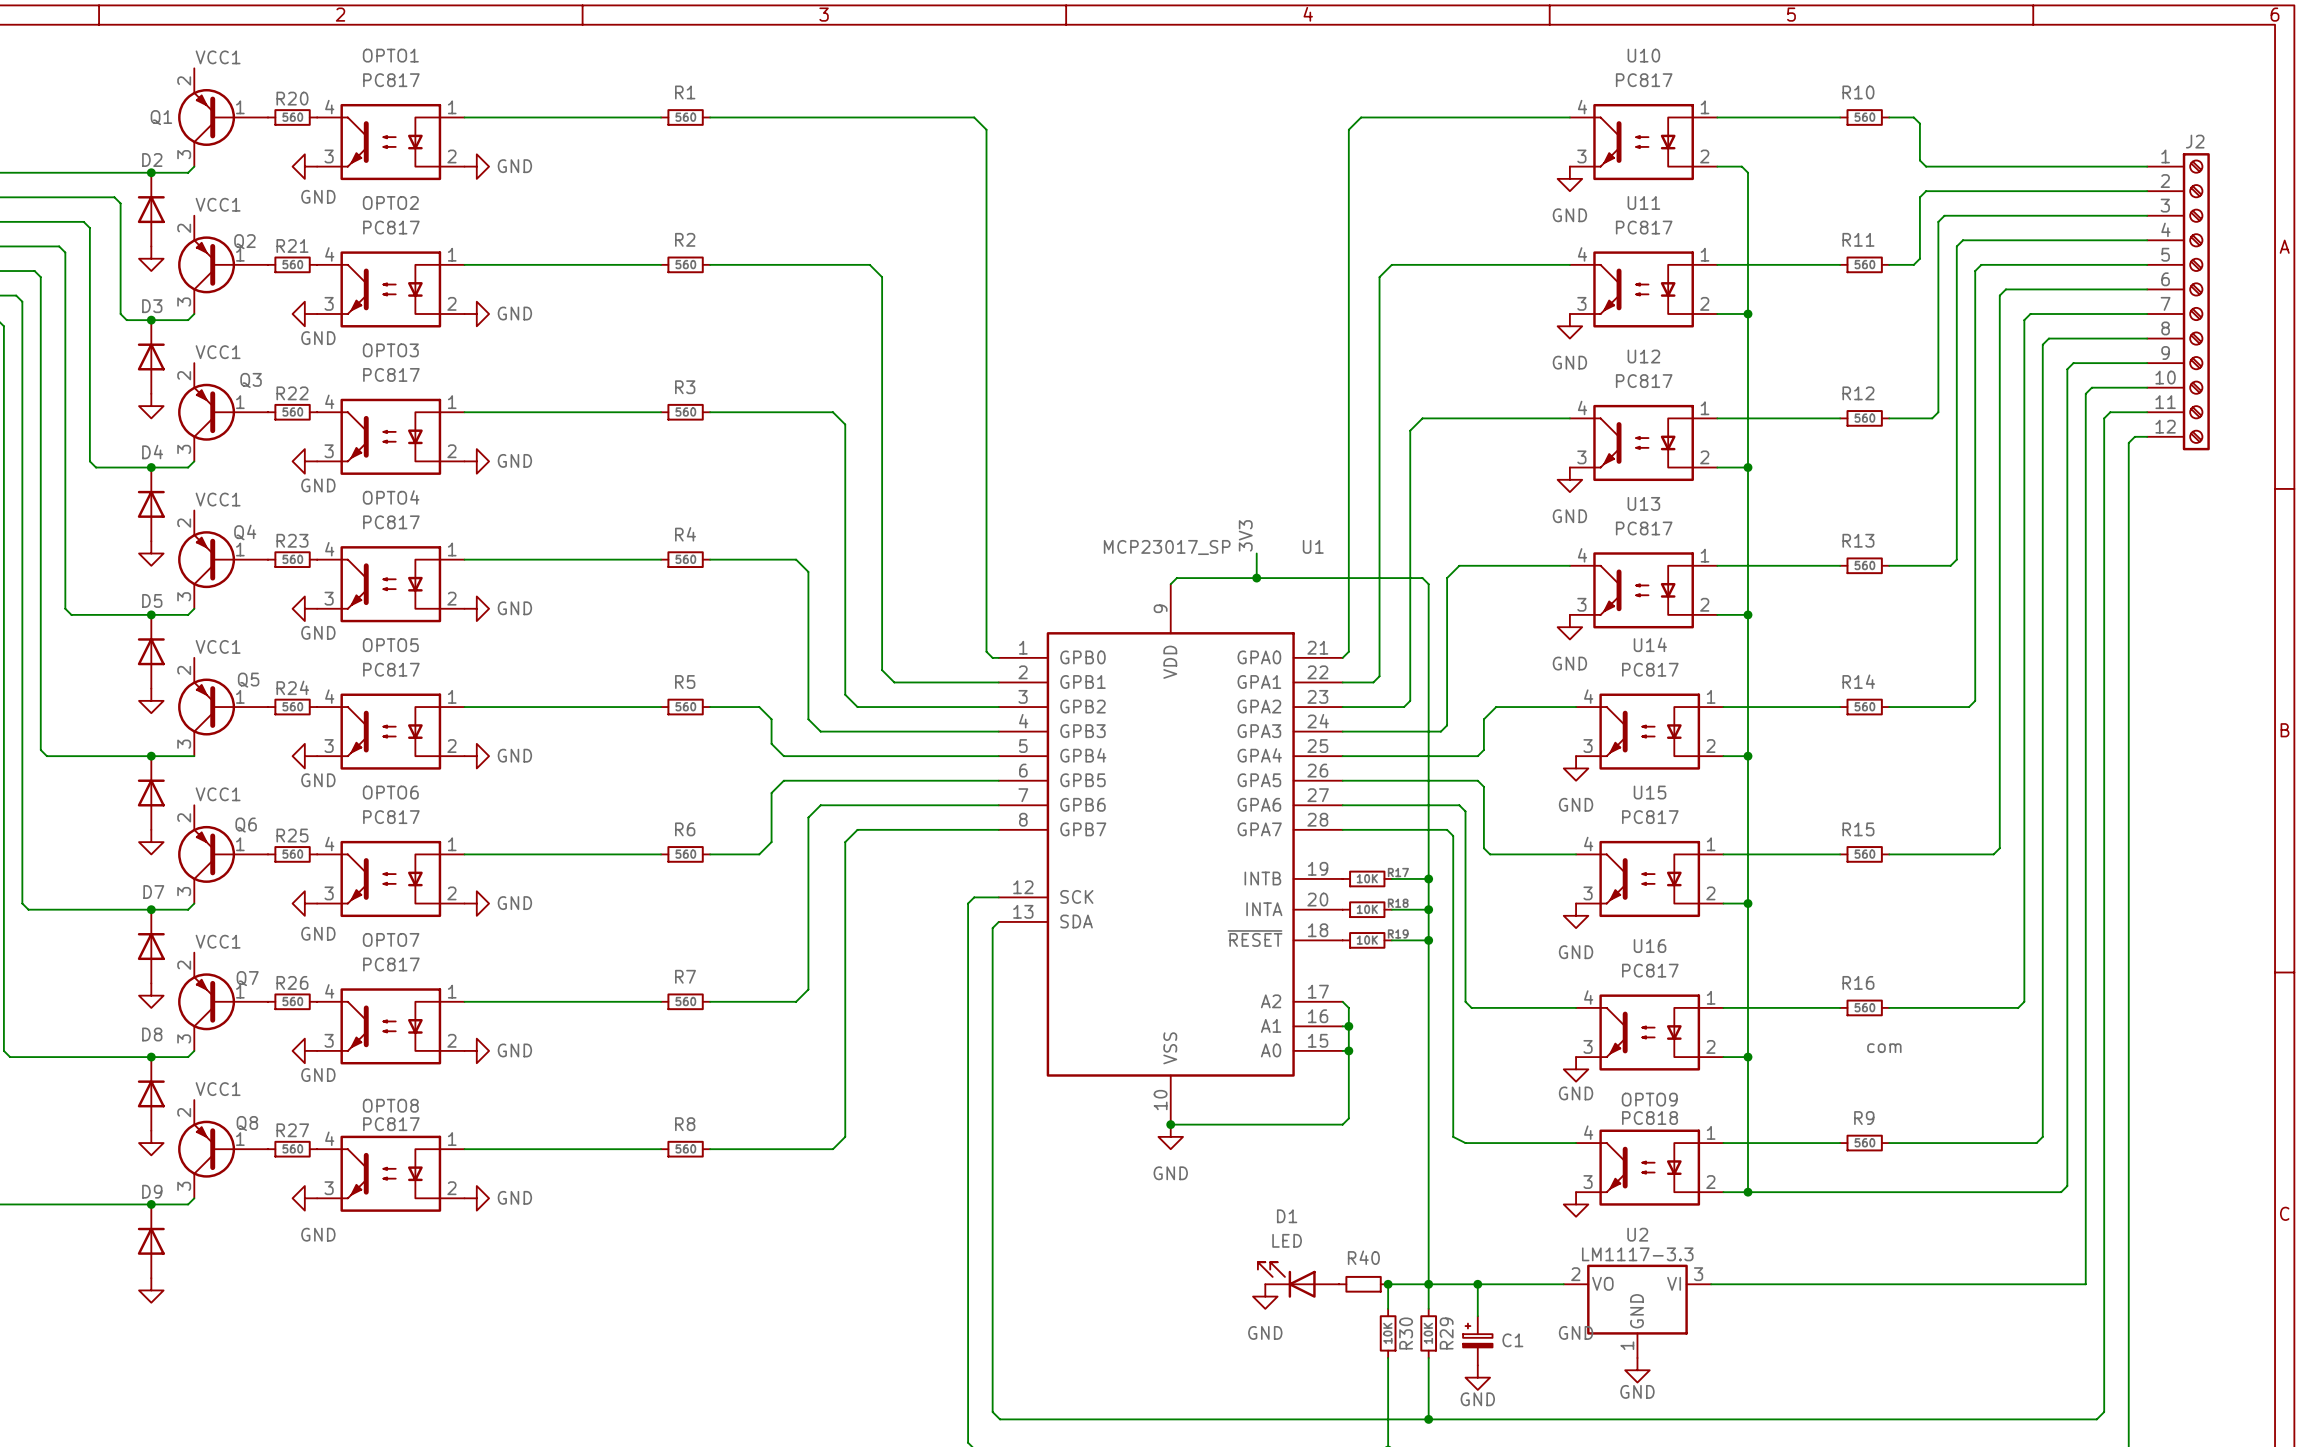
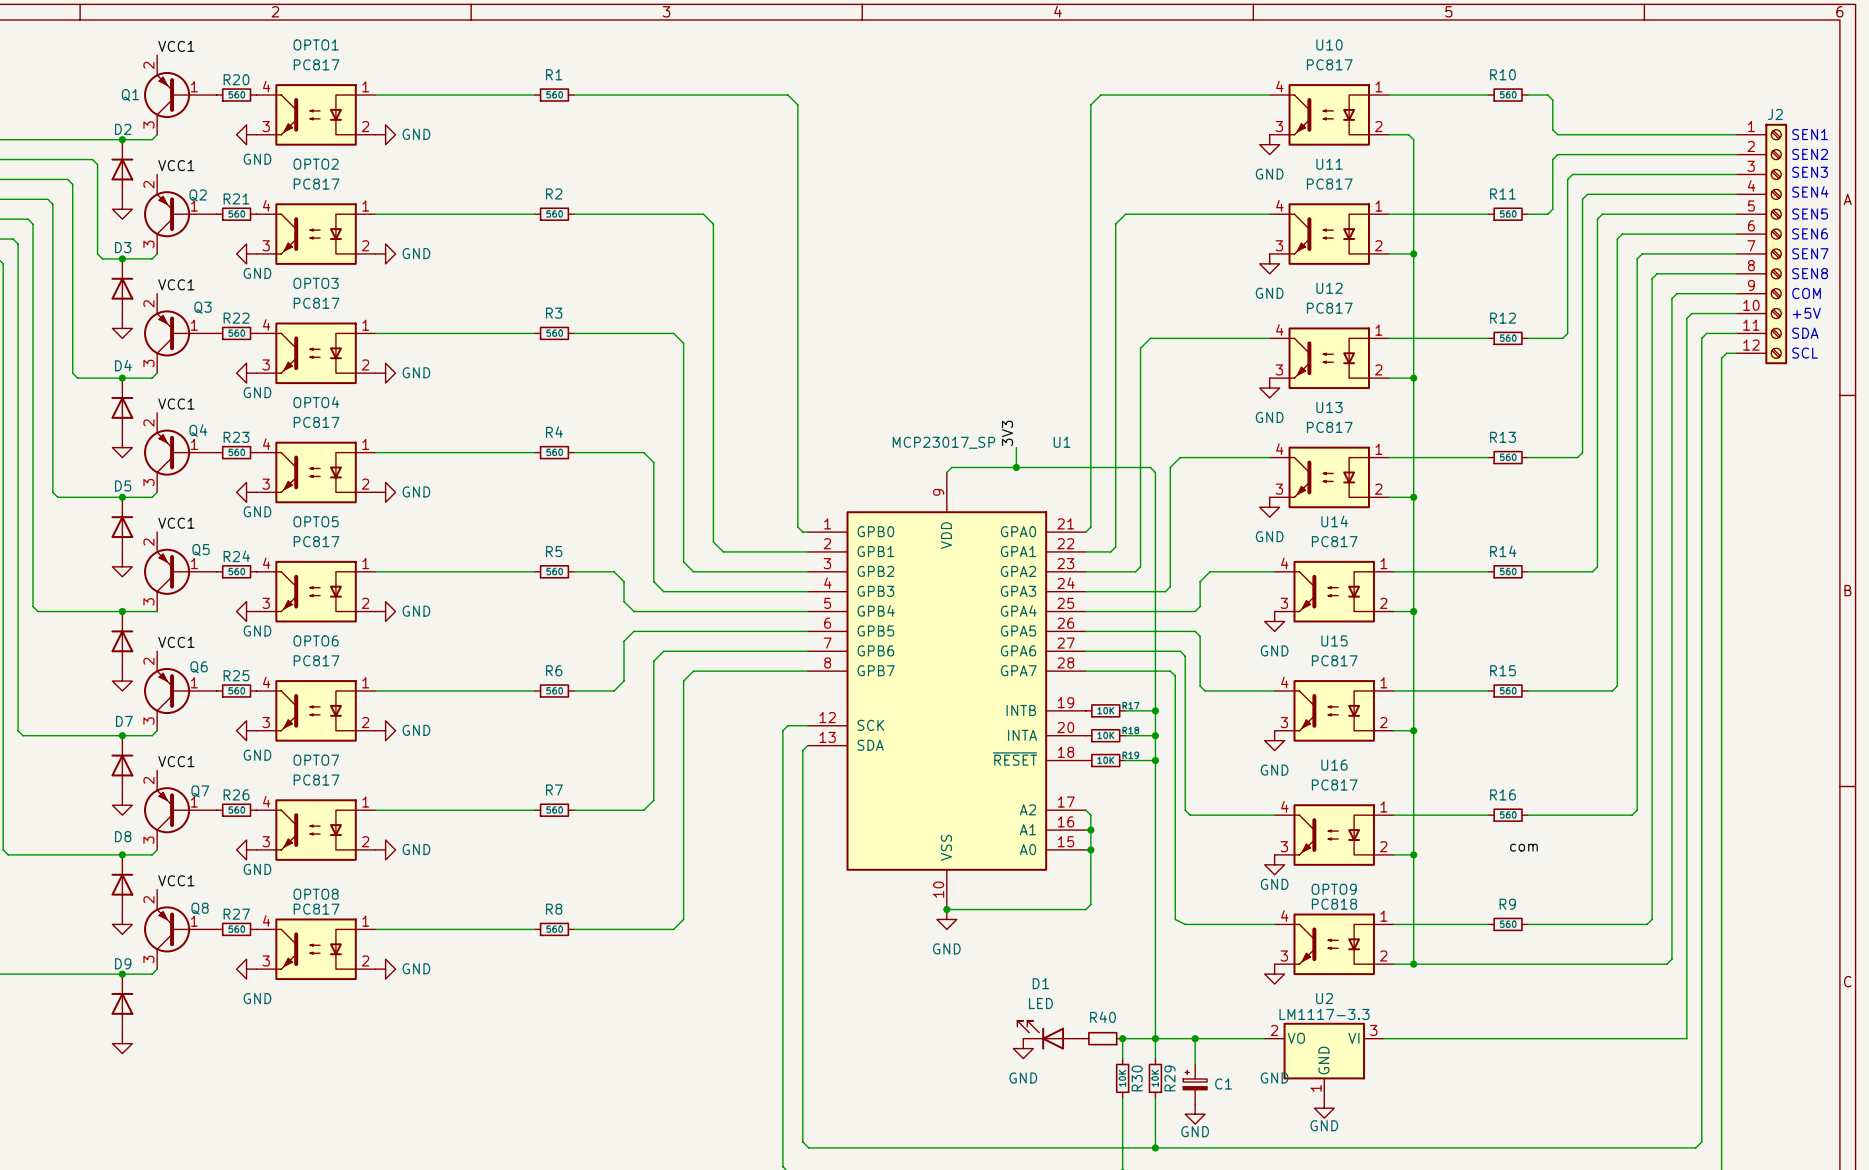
text: none -> SEN1 (1810, 134)
text: none -> SEN2 (1810, 154)
text: none -> SEN3 (1810, 172)
text: none -> SEN4 (1810, 191)
text: none -> SEN5 (1810, 214)
text: none -> SEN6 (1810, 233)
text: none -> SEN7 (1810, 253)
text: none -> SEN8 (1810, 273)
text: none -> COM (1806, 293)
text: none -> +5V (1806, 313)
text: none -> SDA (1805, 333)
text: none -> SCL (1805, 353)

